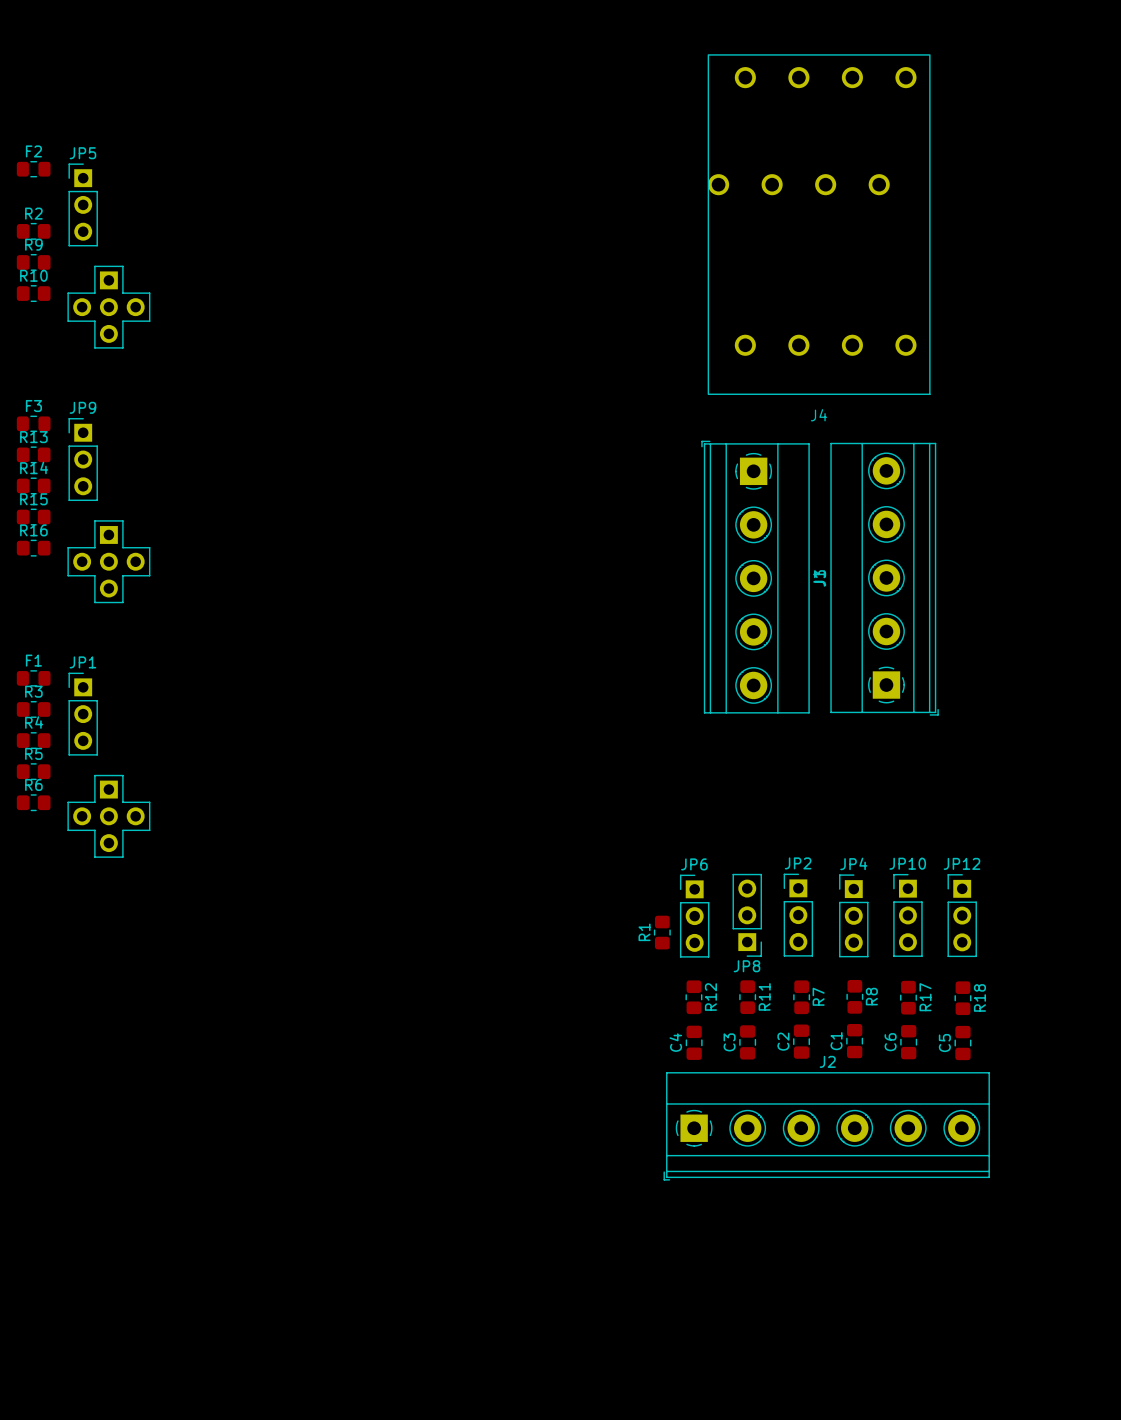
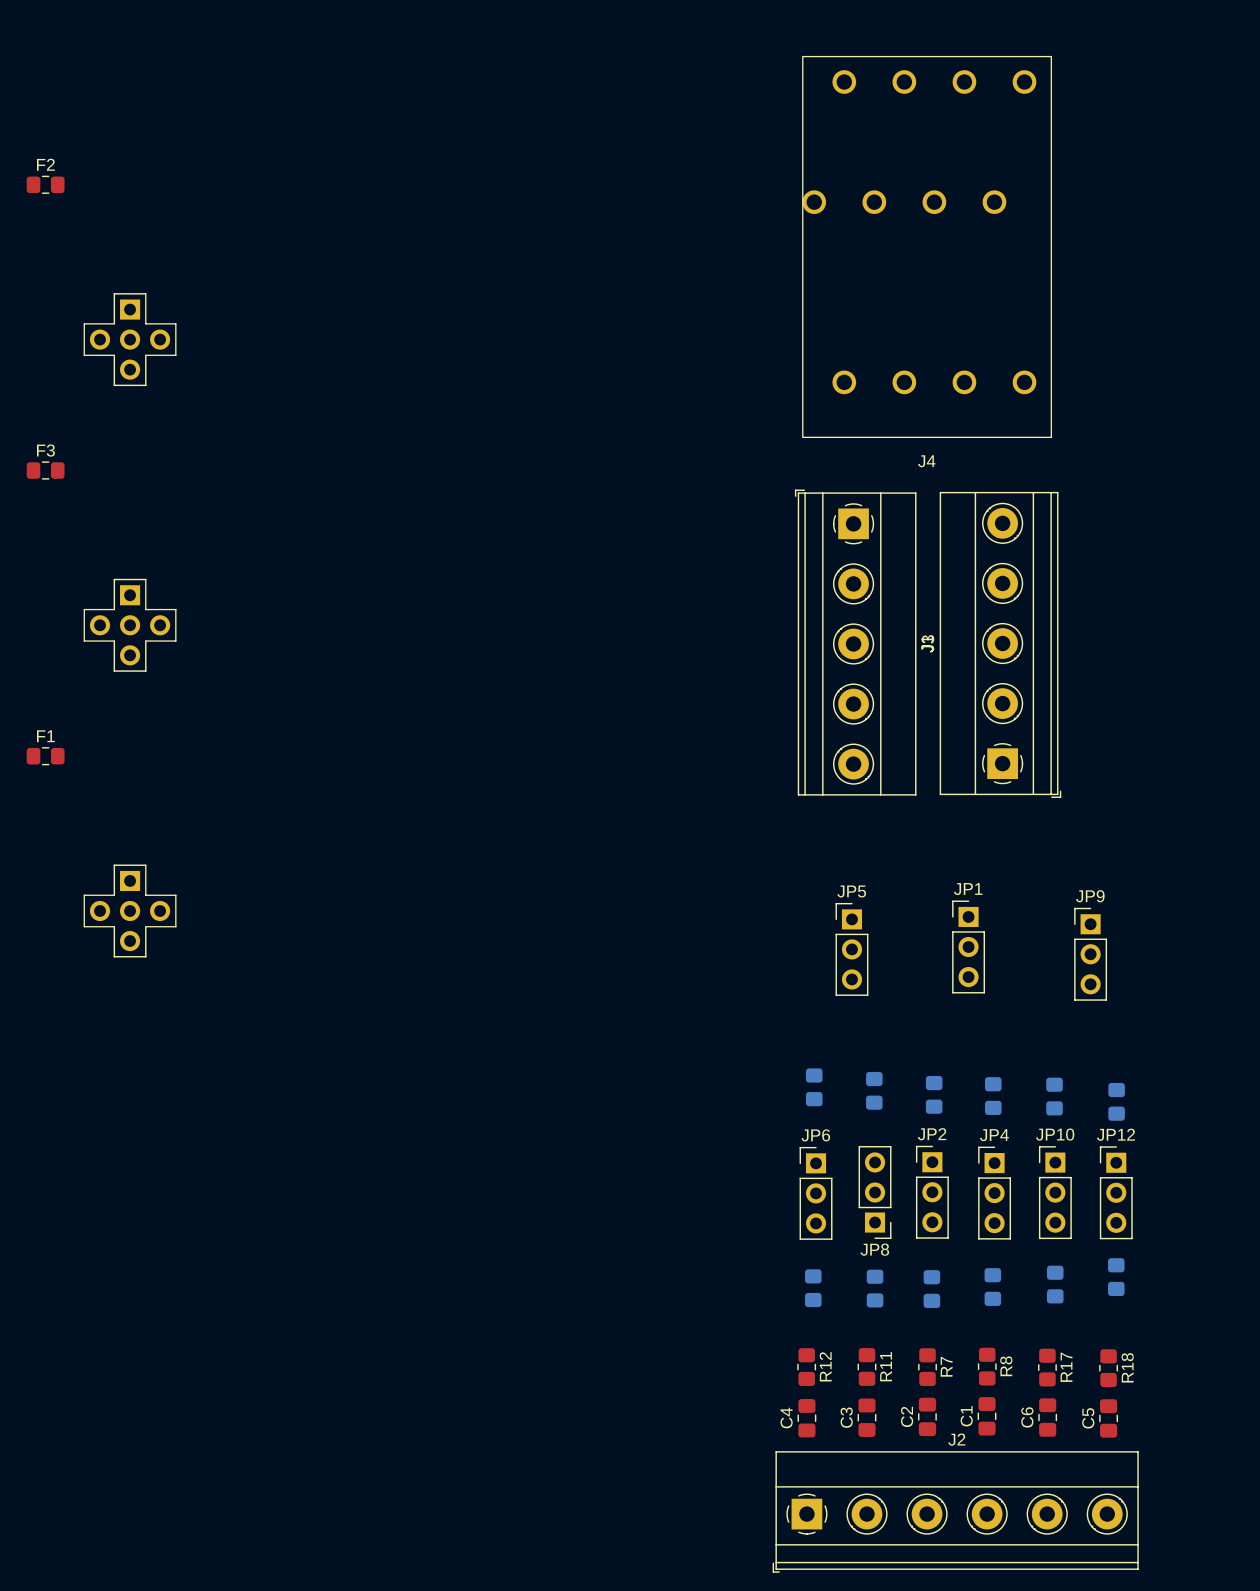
JP5 position: (83, 204) -> (851, 949)
R2: (33, 231) -> none
R9: (33, 262) -> none
R10: (33, 293) -> none
R13: (33, 454) -> none
JP9 position: (83, 459) -> (1090, 954)
R14: (33, 485) -> none
R15: (33, 517) -> none
R16: (33, 548) -> none
R3: (33, 709) -> none
JP1 position: (83, 714) -> (968, 947)
R4: (33, 740) -> none
R5: (33, 771) -> none
R6: (33, 802) -> none
JP8 position: (747, 915) -> (875, 1192)
JP2 position: (798, 915) -> (932, 1192)
JP4 position: (853, 915) -> (994, 1193)
JP10 position: (907, 915) -> (1055, 1192)
JP12 position: (962, 915) -> (1116, 1192)
JP6 position: (694, 916) -> (816, 1193)
R1 side: top (662, 932) -> bottom (813, 1288)
part: none -> (814, 1087)
part: none -> (874, 1090)
part: none -> (934, 1094)
part: none -> (993, 1096)
part: none -> (1054, 1096)
part: none -> (1116, 1101)
R8 position: (854, 996) -> (987, 1366)
R12 position: (693, 997) -> (806, 1367)
R11 position: (747, 997) -> (866, 1366)
R7 position: (801, 997) -> (927, 1367)
R17 position: (908, 997) -> (1047, 1367)
R18 position: (962, 998) -> (1108, 1368)
C2 position: (801, 1041) -> (927, 1416)
C1 position: (854, 1041) -> (987, 1416)
C4 position: (694, 1042) -> (806, 1418)
C3 position: (747, 1042) -> (866, 1417)
C6 position: (908, 1042) -> (1047, 1417)
C5 position: (962, 1043) -> (1108, 1418)
J2 position: (826, 1126) -> (955, 1511)
part: none -> (1116, 1277)
part: none -> (1055, 1284)
part: none -> (992, 1287)
part: none -> (875, 1288)
part: none -> (931, 1289)

